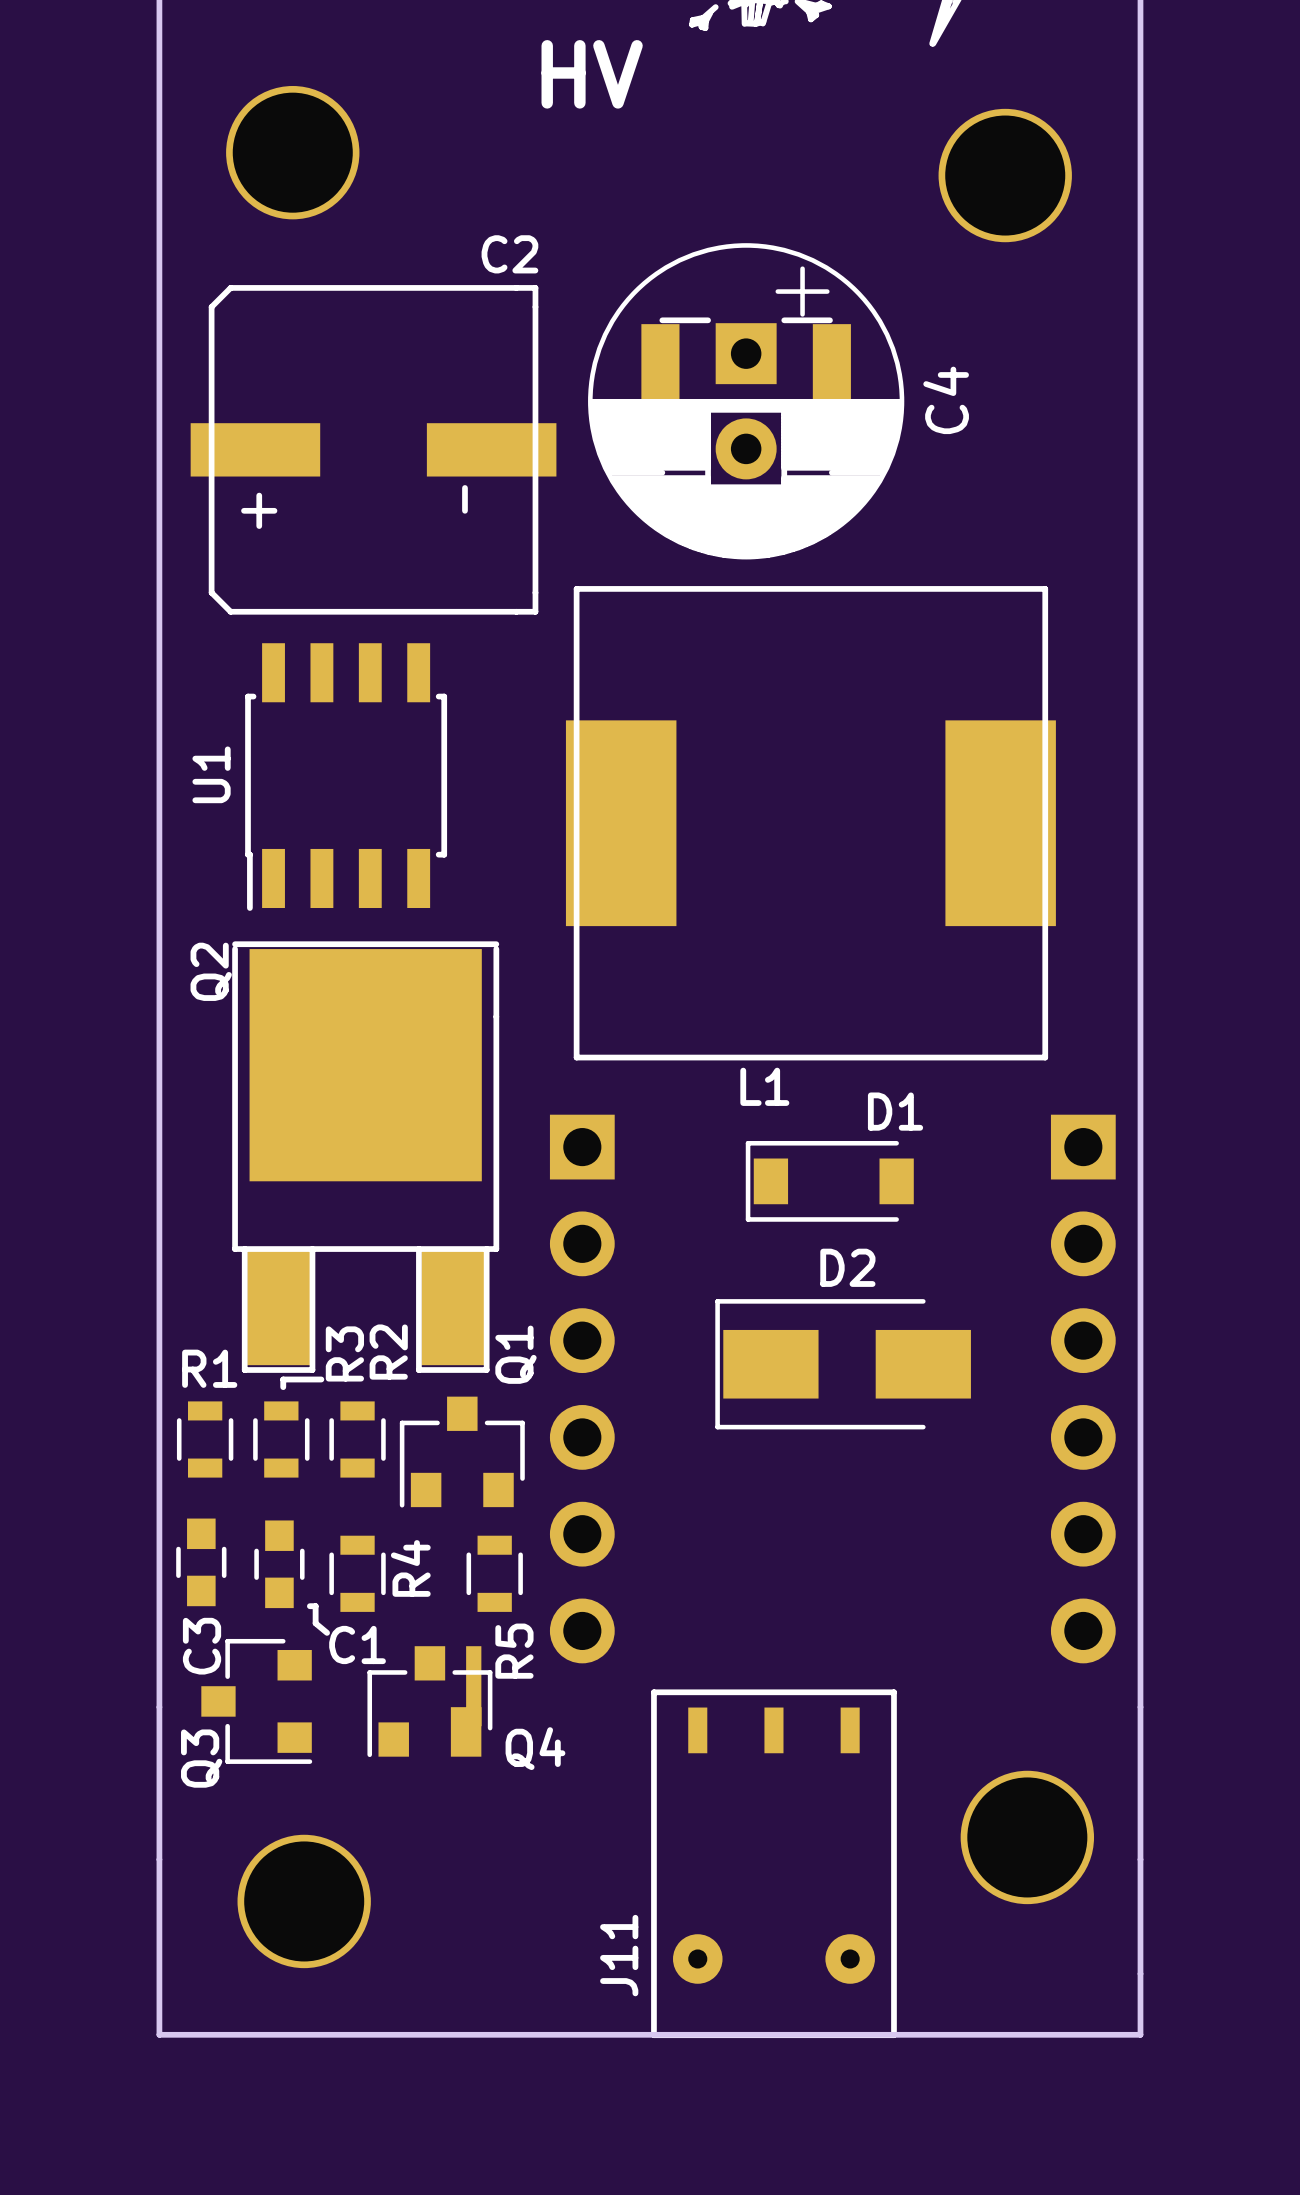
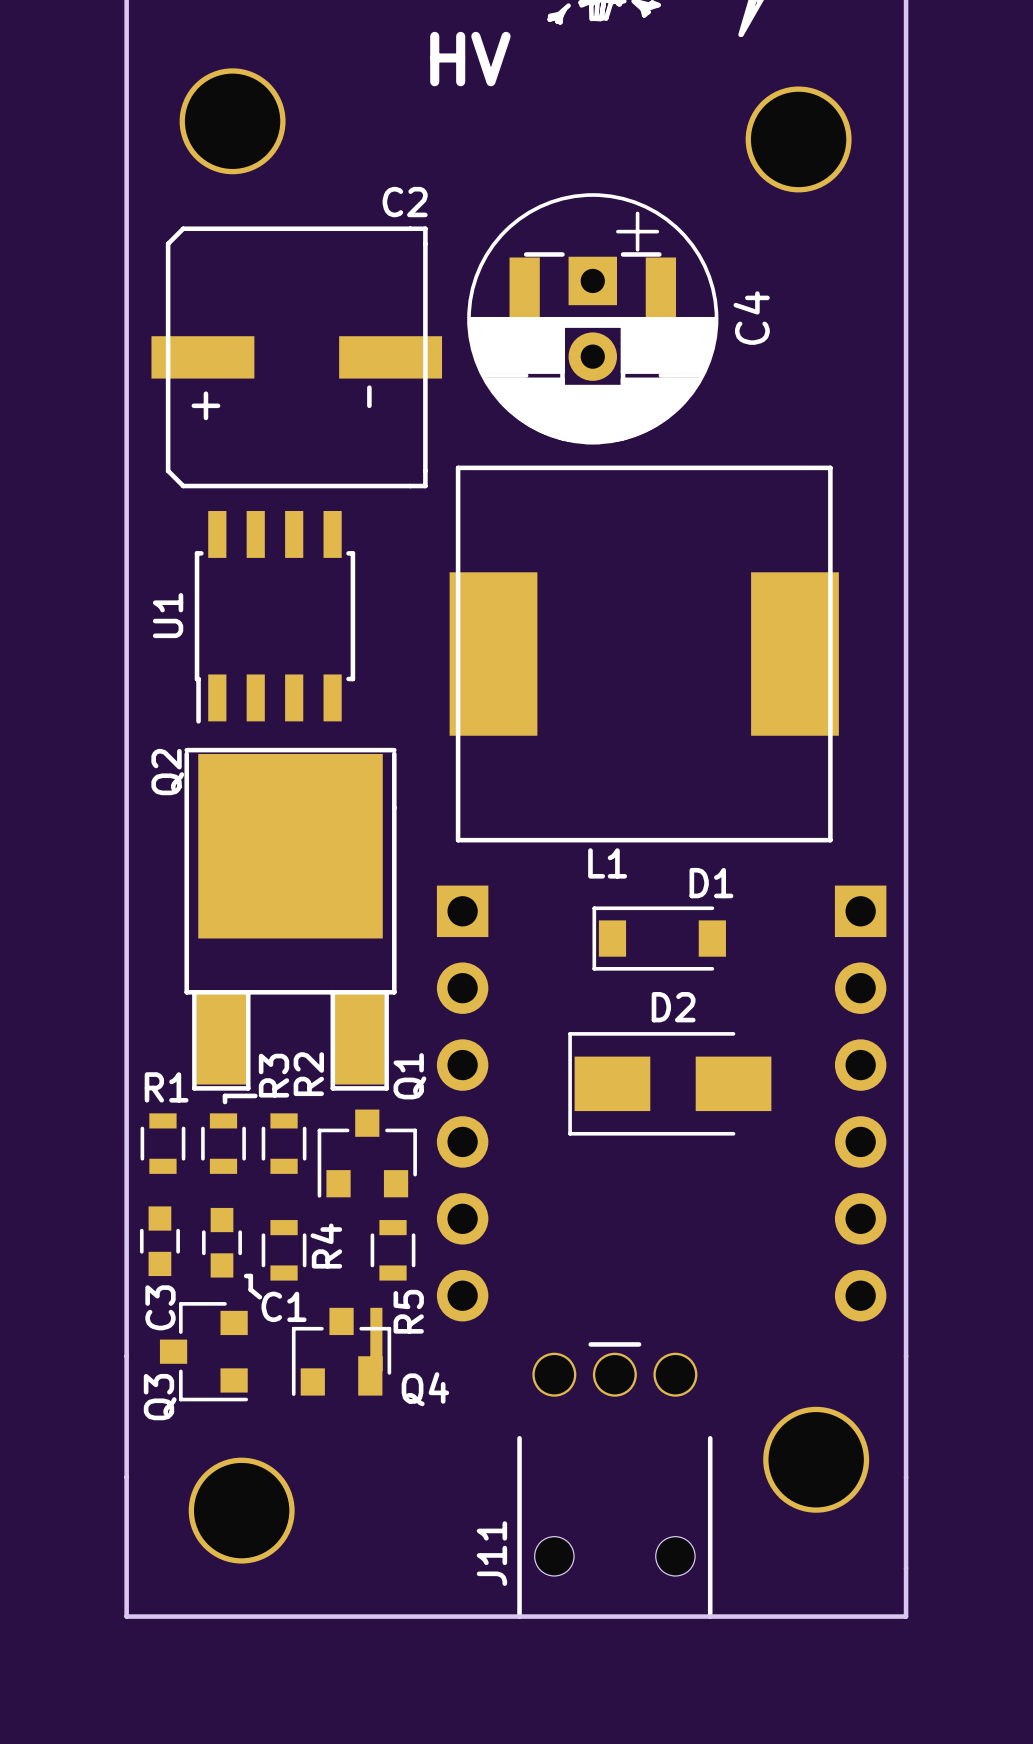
J11 footprint: [651, 1689, 897, 2039] -> [517, 1342, 713, 1620]

